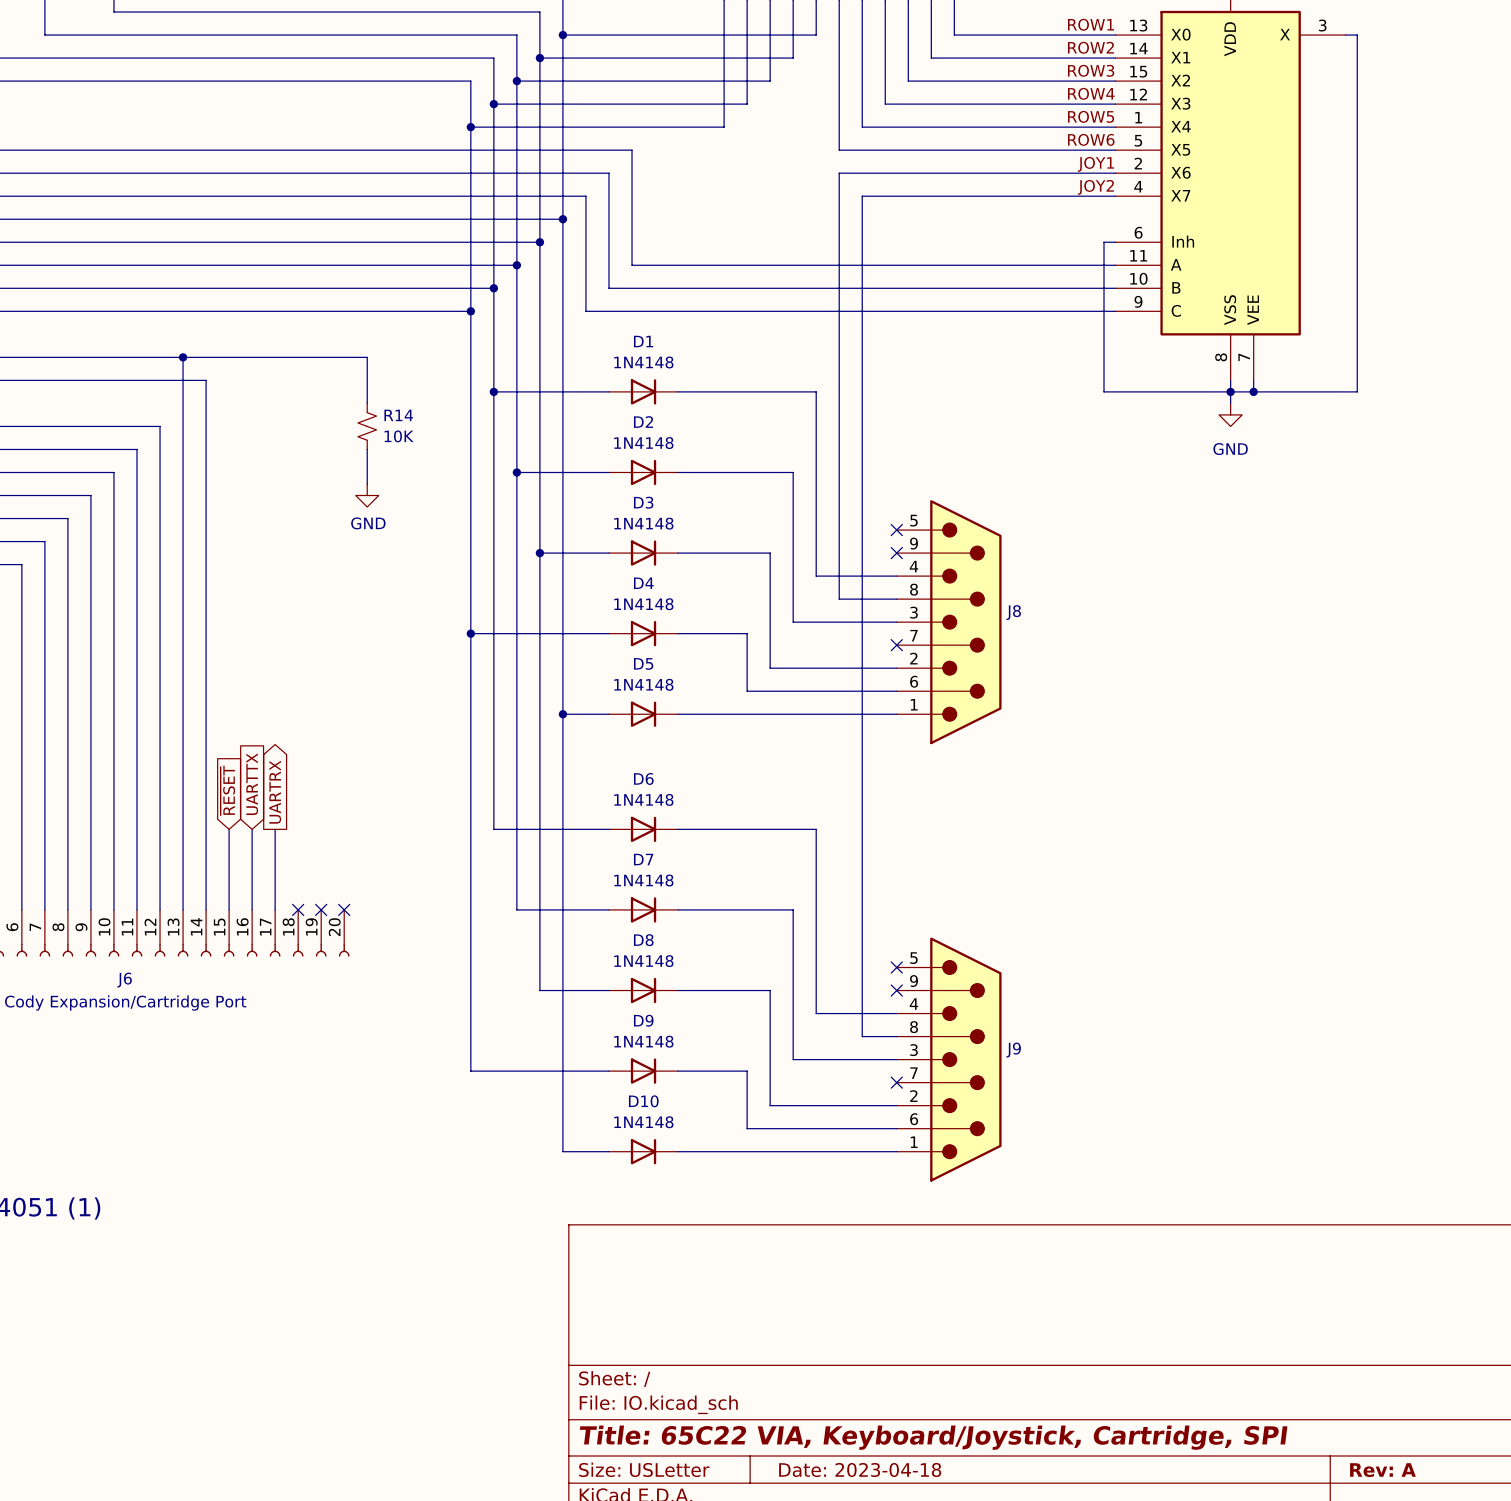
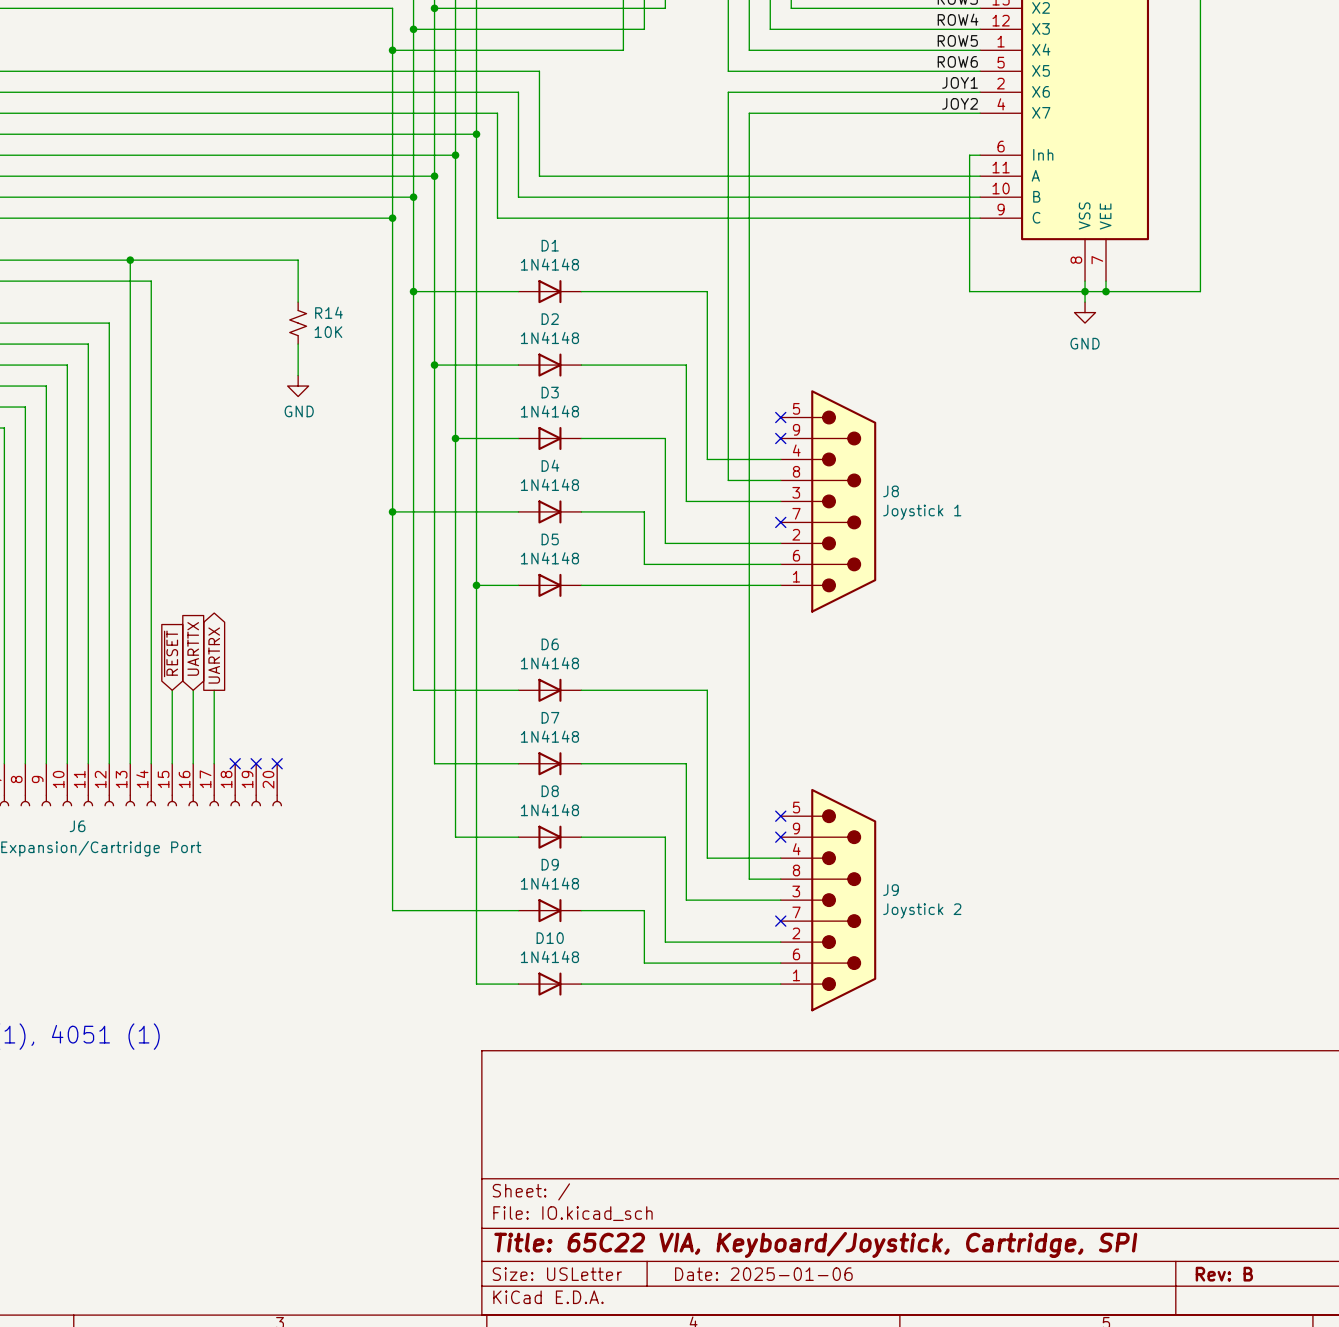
J8 value: none -> Joystick 1 (922, 512)
J9 value: none -> Joystick 2 (922, 910)
title block: Date: 2023-04-18 (860, 1470) -> Date: 2025-01-06 (763, 1274)
title block: Rev: A (1382, 1470) -> Rev: B (1224, 1274)

